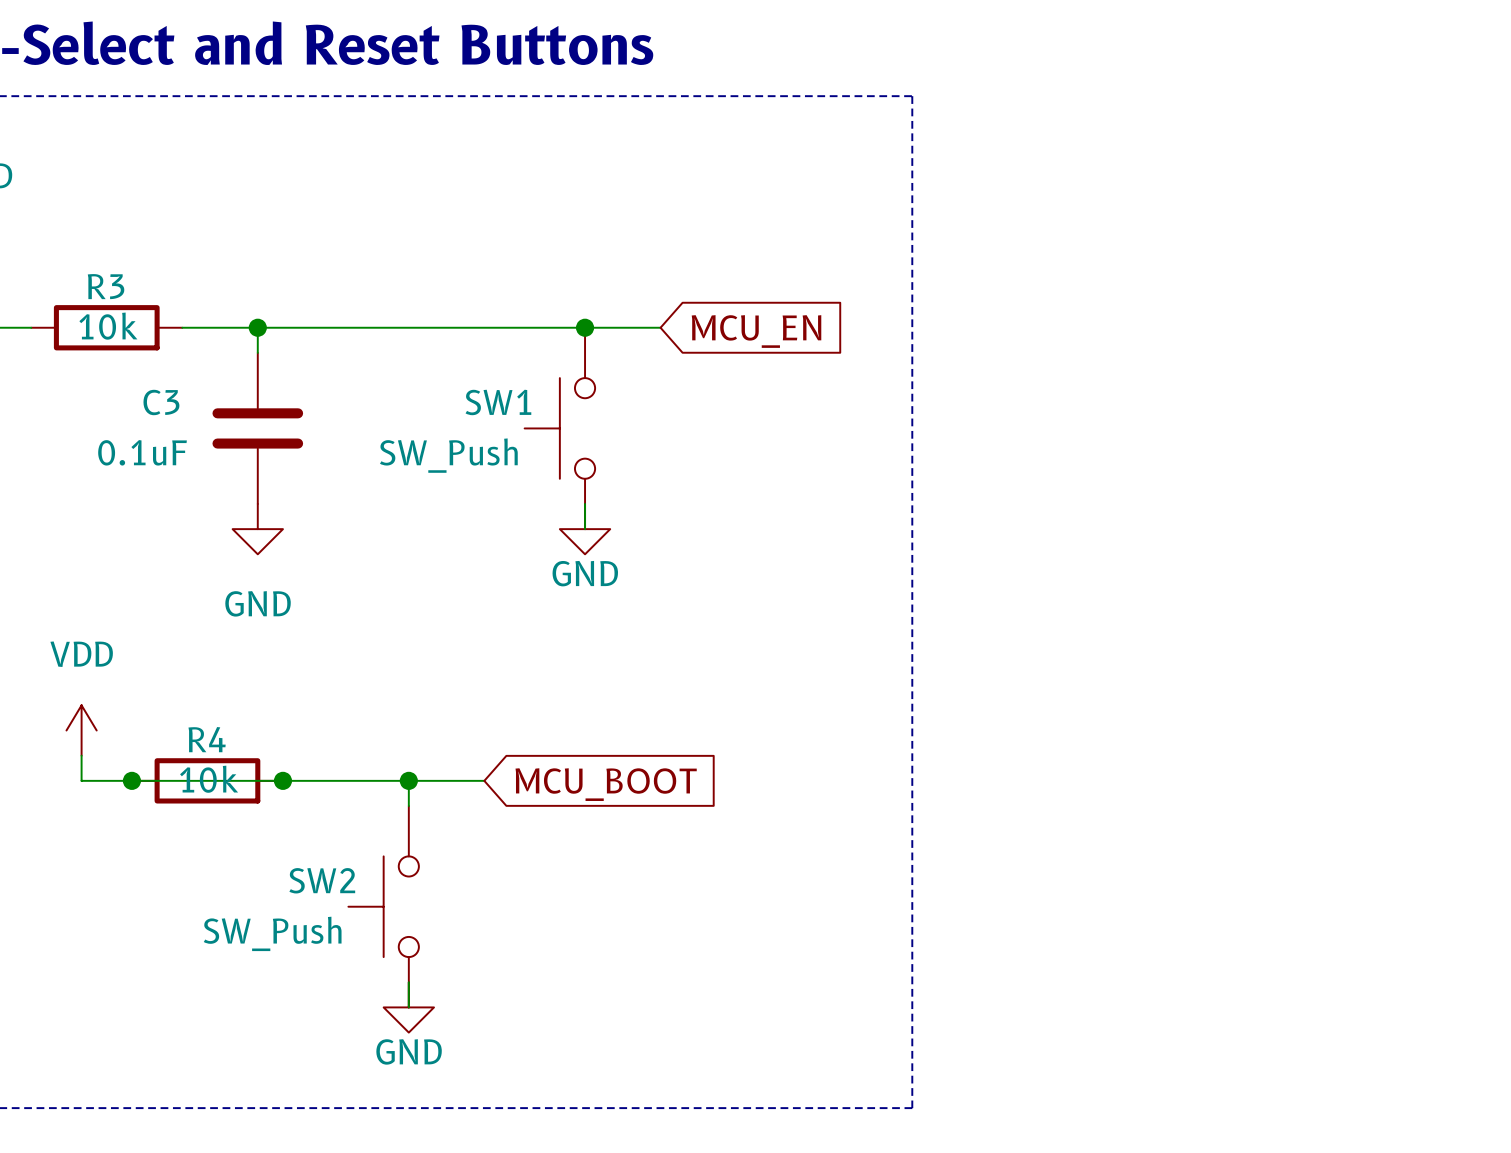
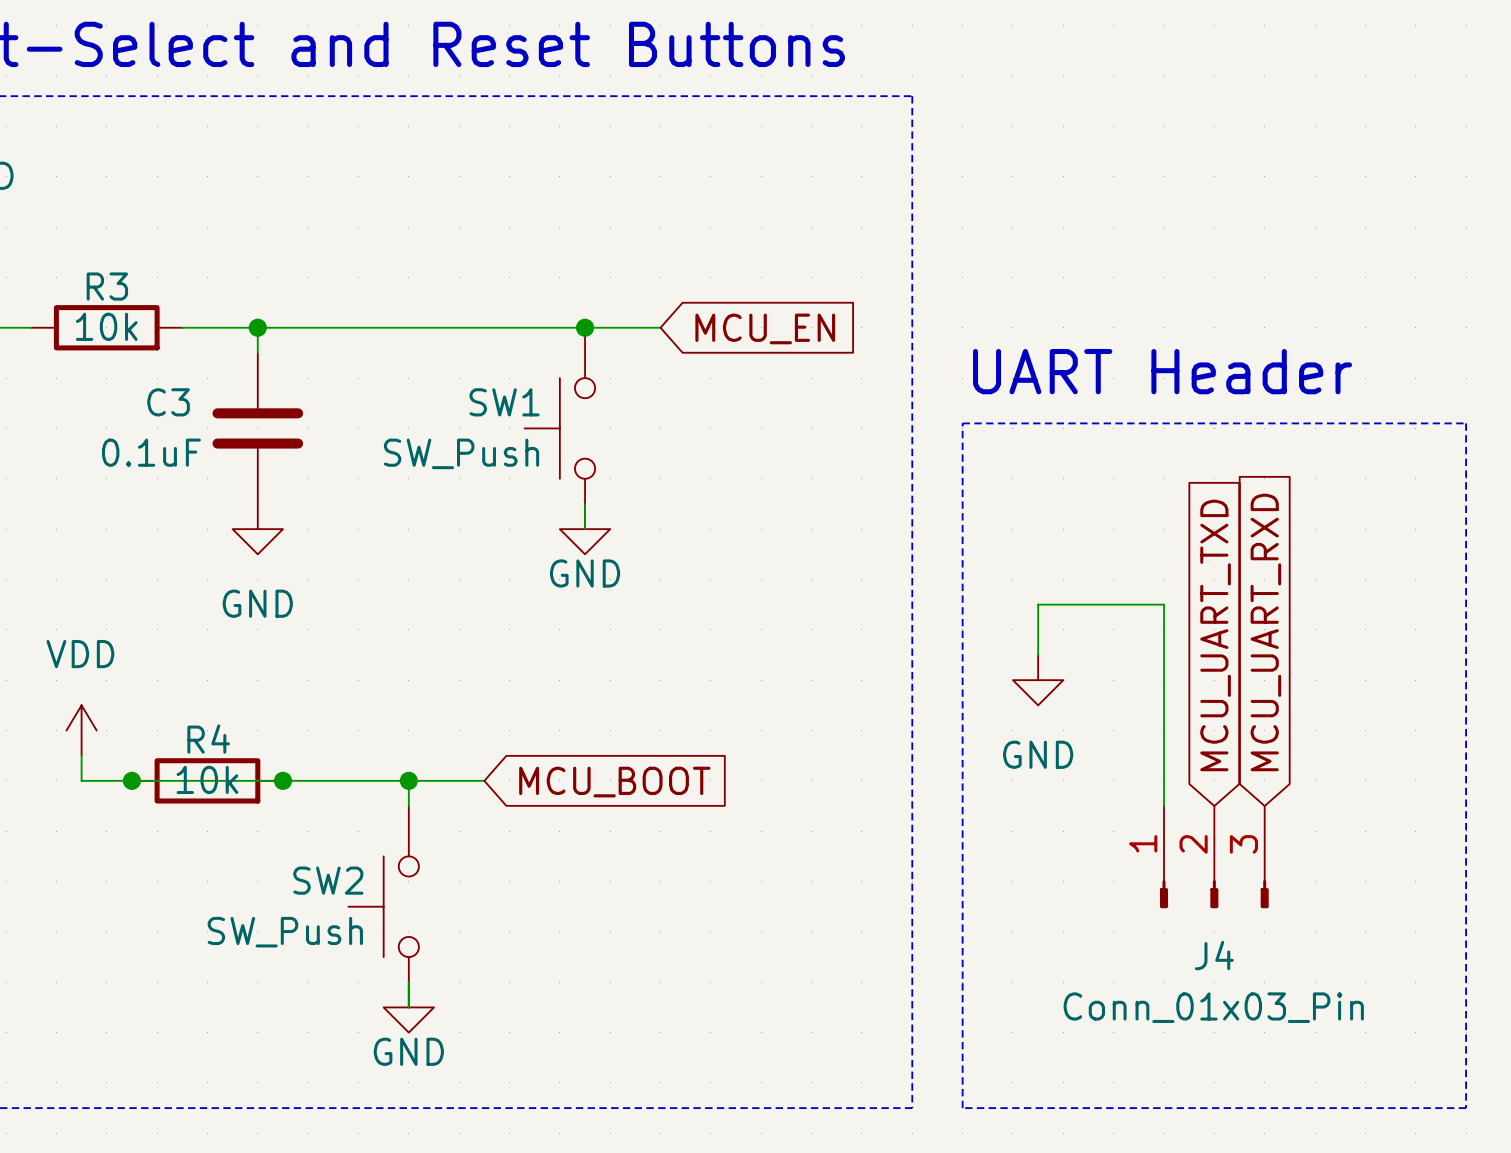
text: none -> UART Header (1162, 371)
line: none -> (962, 423) (1466, 423) (1466, 1108) (962, 1108) (962, 423)
global label: none -> MCU_UART_RXD (1265, 632)
global label: none -> MCU_UART_TXD (1215, 635)
wire: none -> (1038, 655) (1038, 604) (1164, 604) (1164, 806)
power symbol: none -> GND (1038, 680)
J4: none -> Conn_01x03_Pin (1214, 857)

